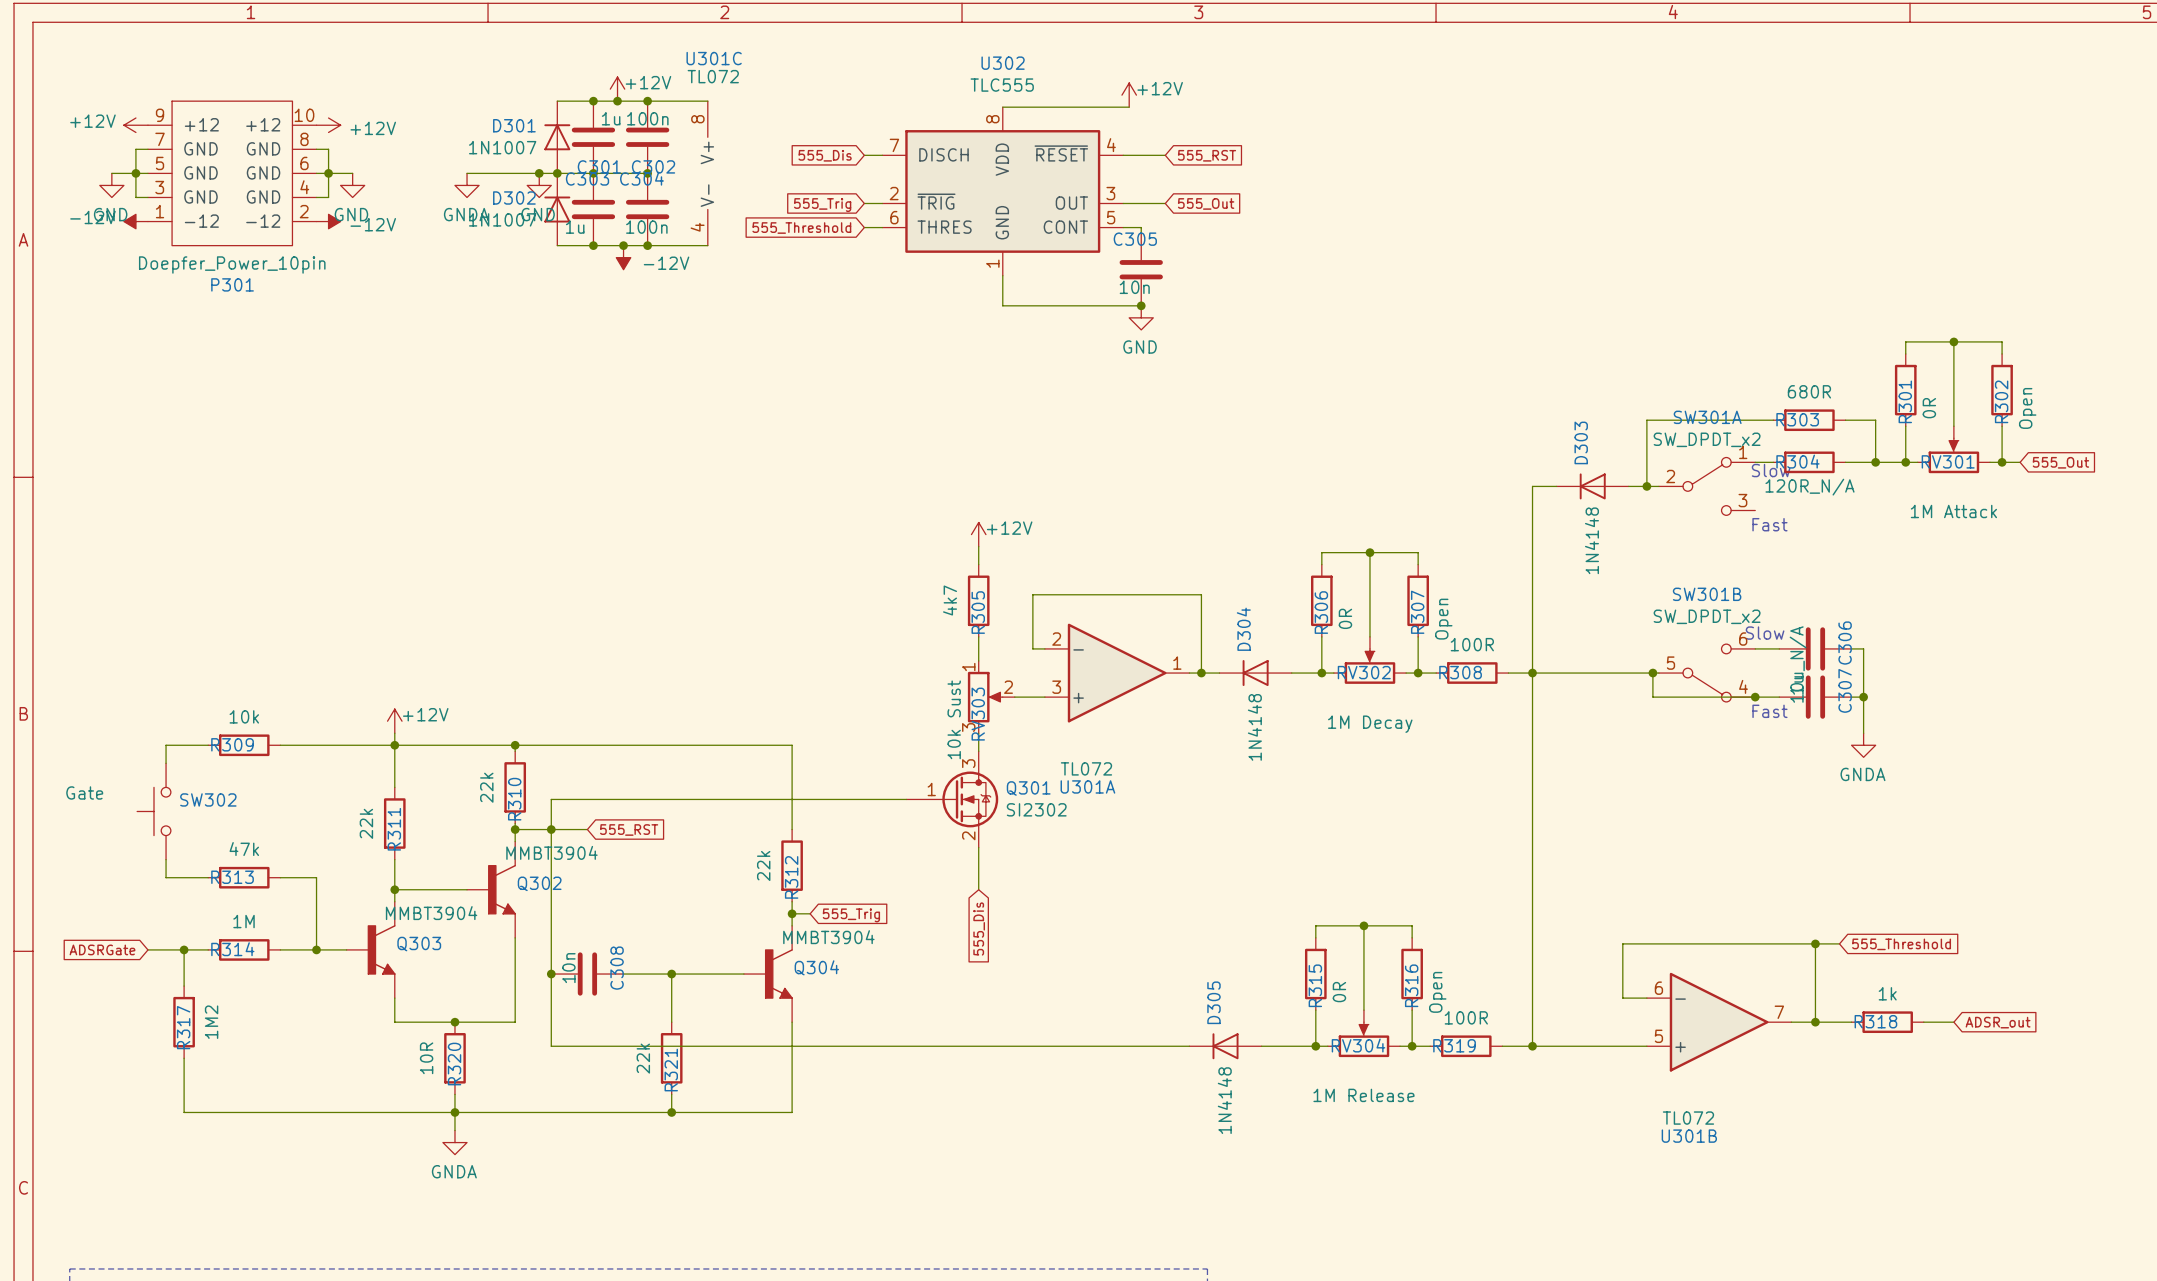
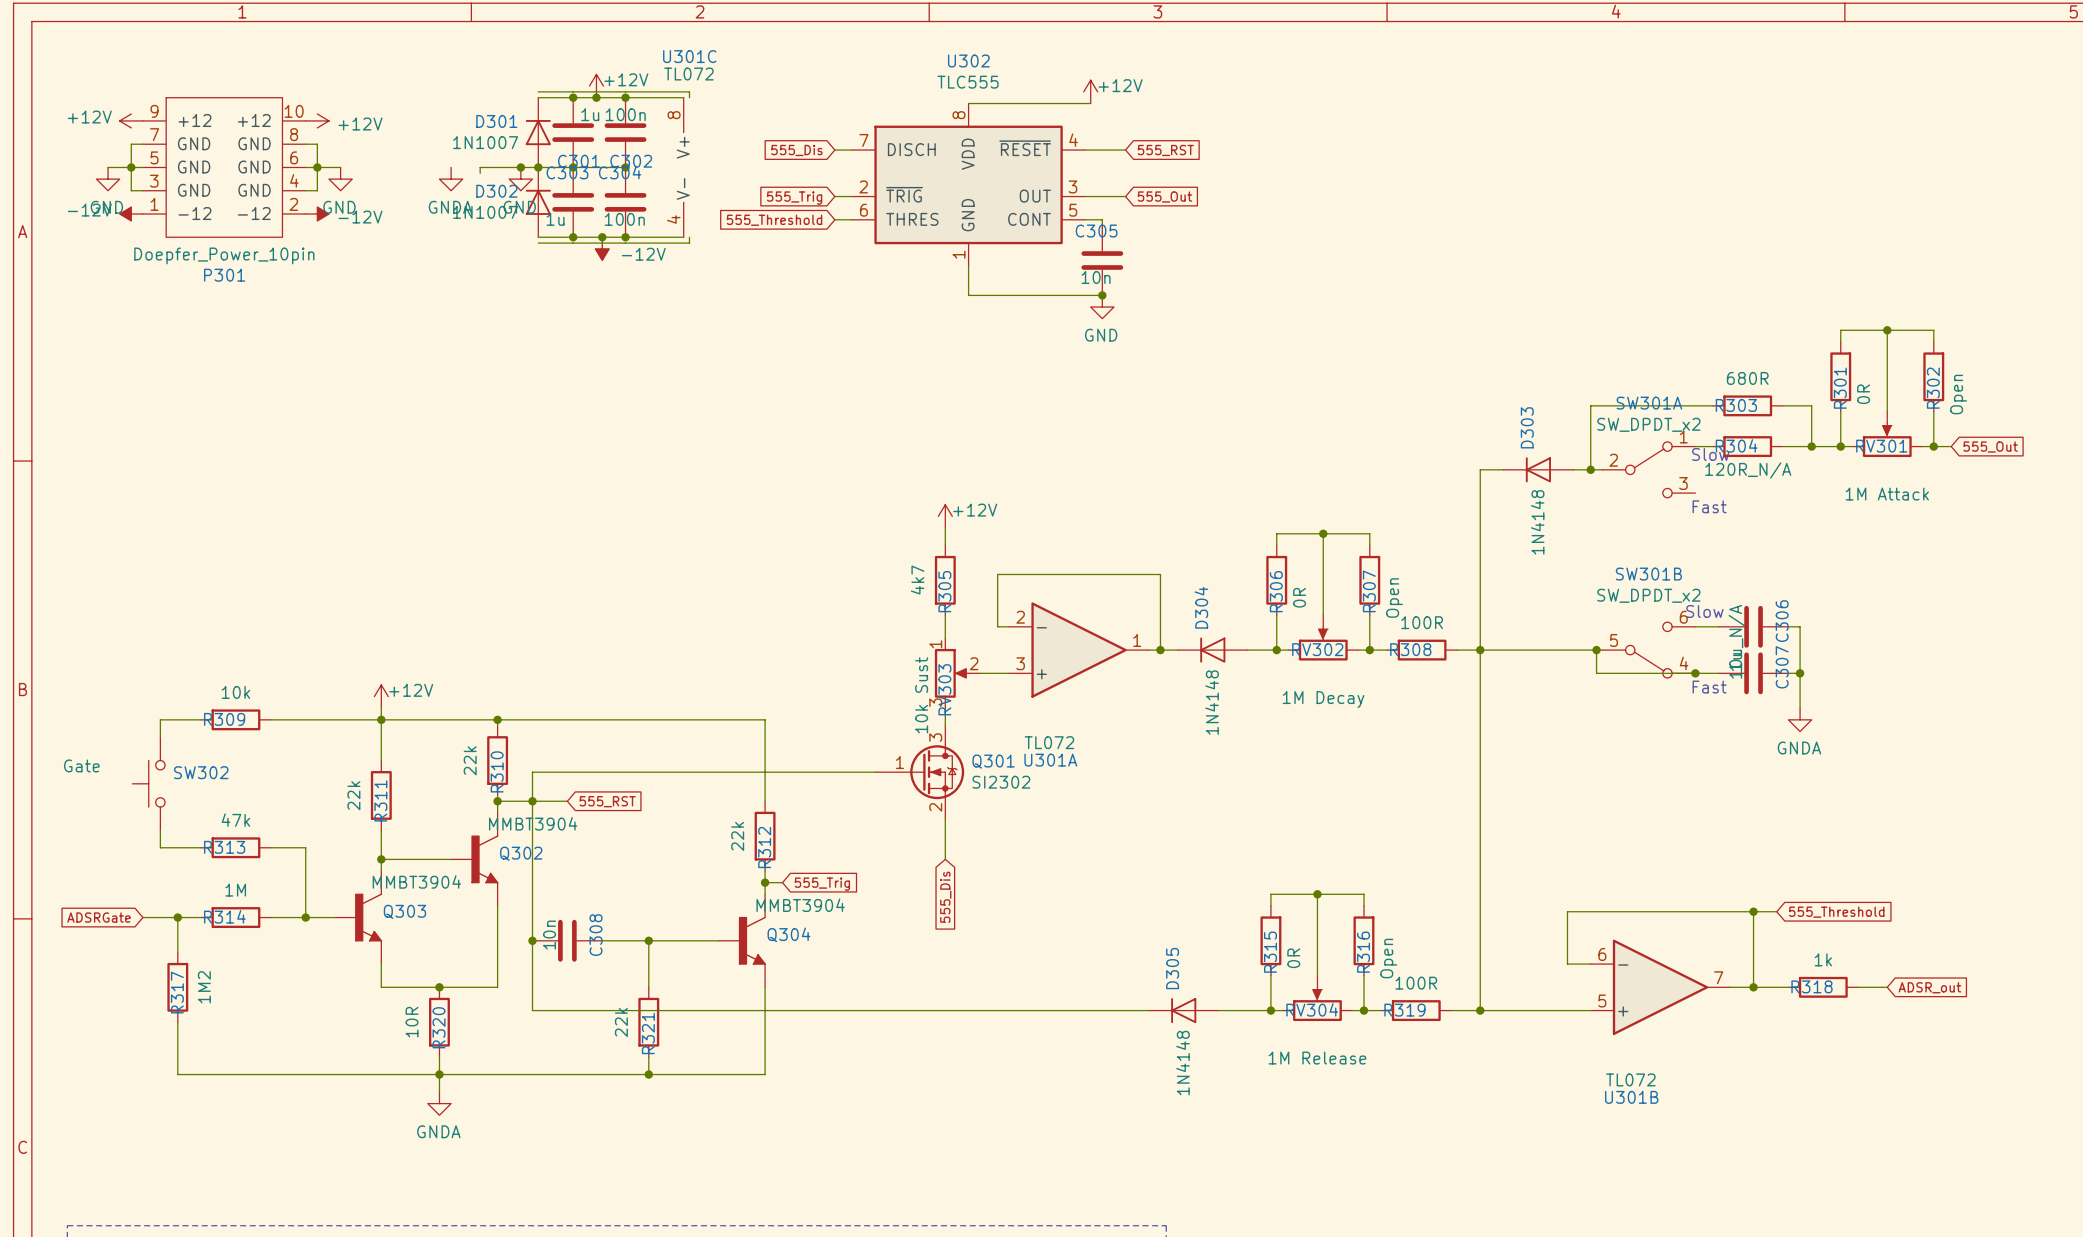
wire: none -> (538, 91) (689, 91) (689, 97)
wire: (467, 173) (497, 173) -> (480, 173) (480, 167)
wire: none -> (689, 237) (689, 243) (538, 243)

